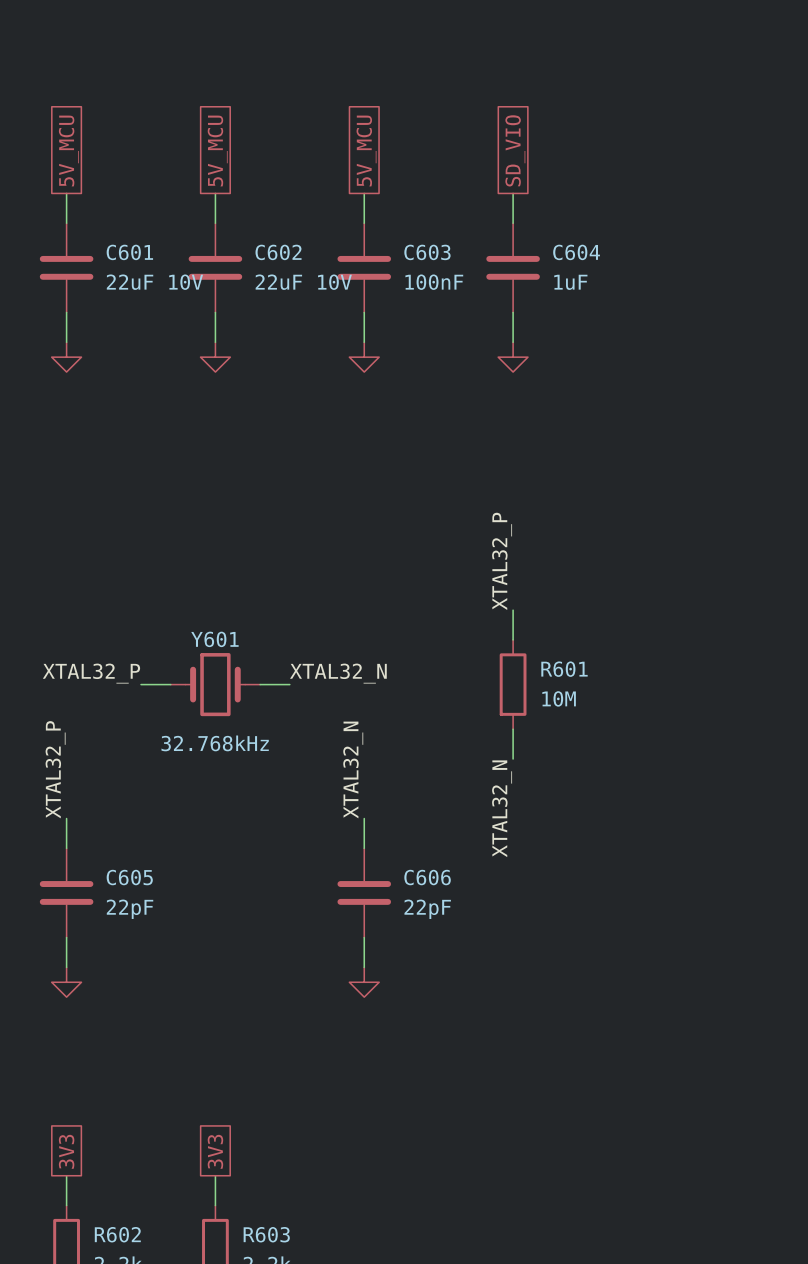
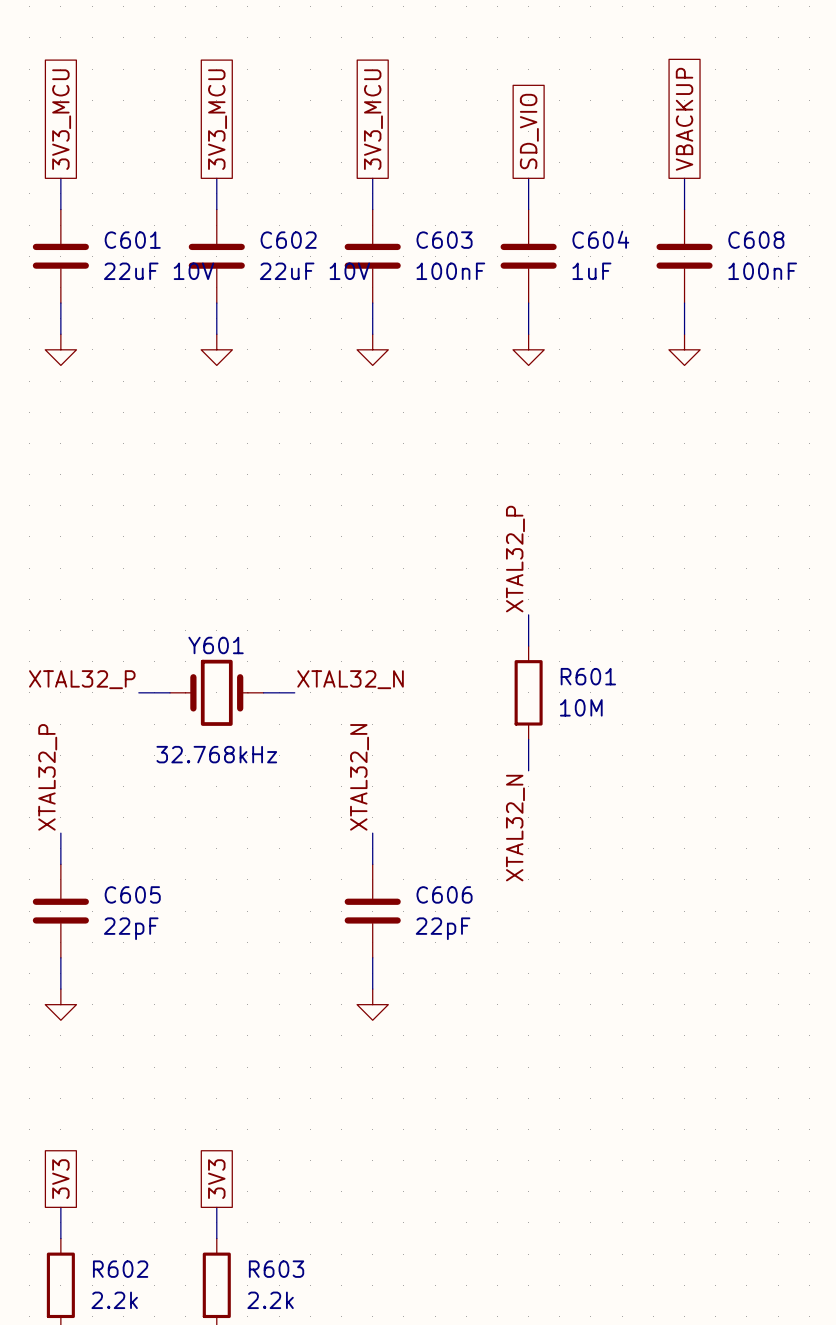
global label: none -> VBACKUP (684, 119)
global label: 5V_MCU (68, 151) -> 3V3_MCU (61, 119)
global label: 5V_MCU (217, 151) -> 3V3_MCU (217, 119)
global label: 5V_MCU (366, 151) -> 3V3_MCU (373, 119)
wire: none -> (684, 178) (684, 209)
C608: none -> 100nF (684, 256)
wire: none -> (684, 303) (684, 334)
power symbol: none -> (684, 349)

